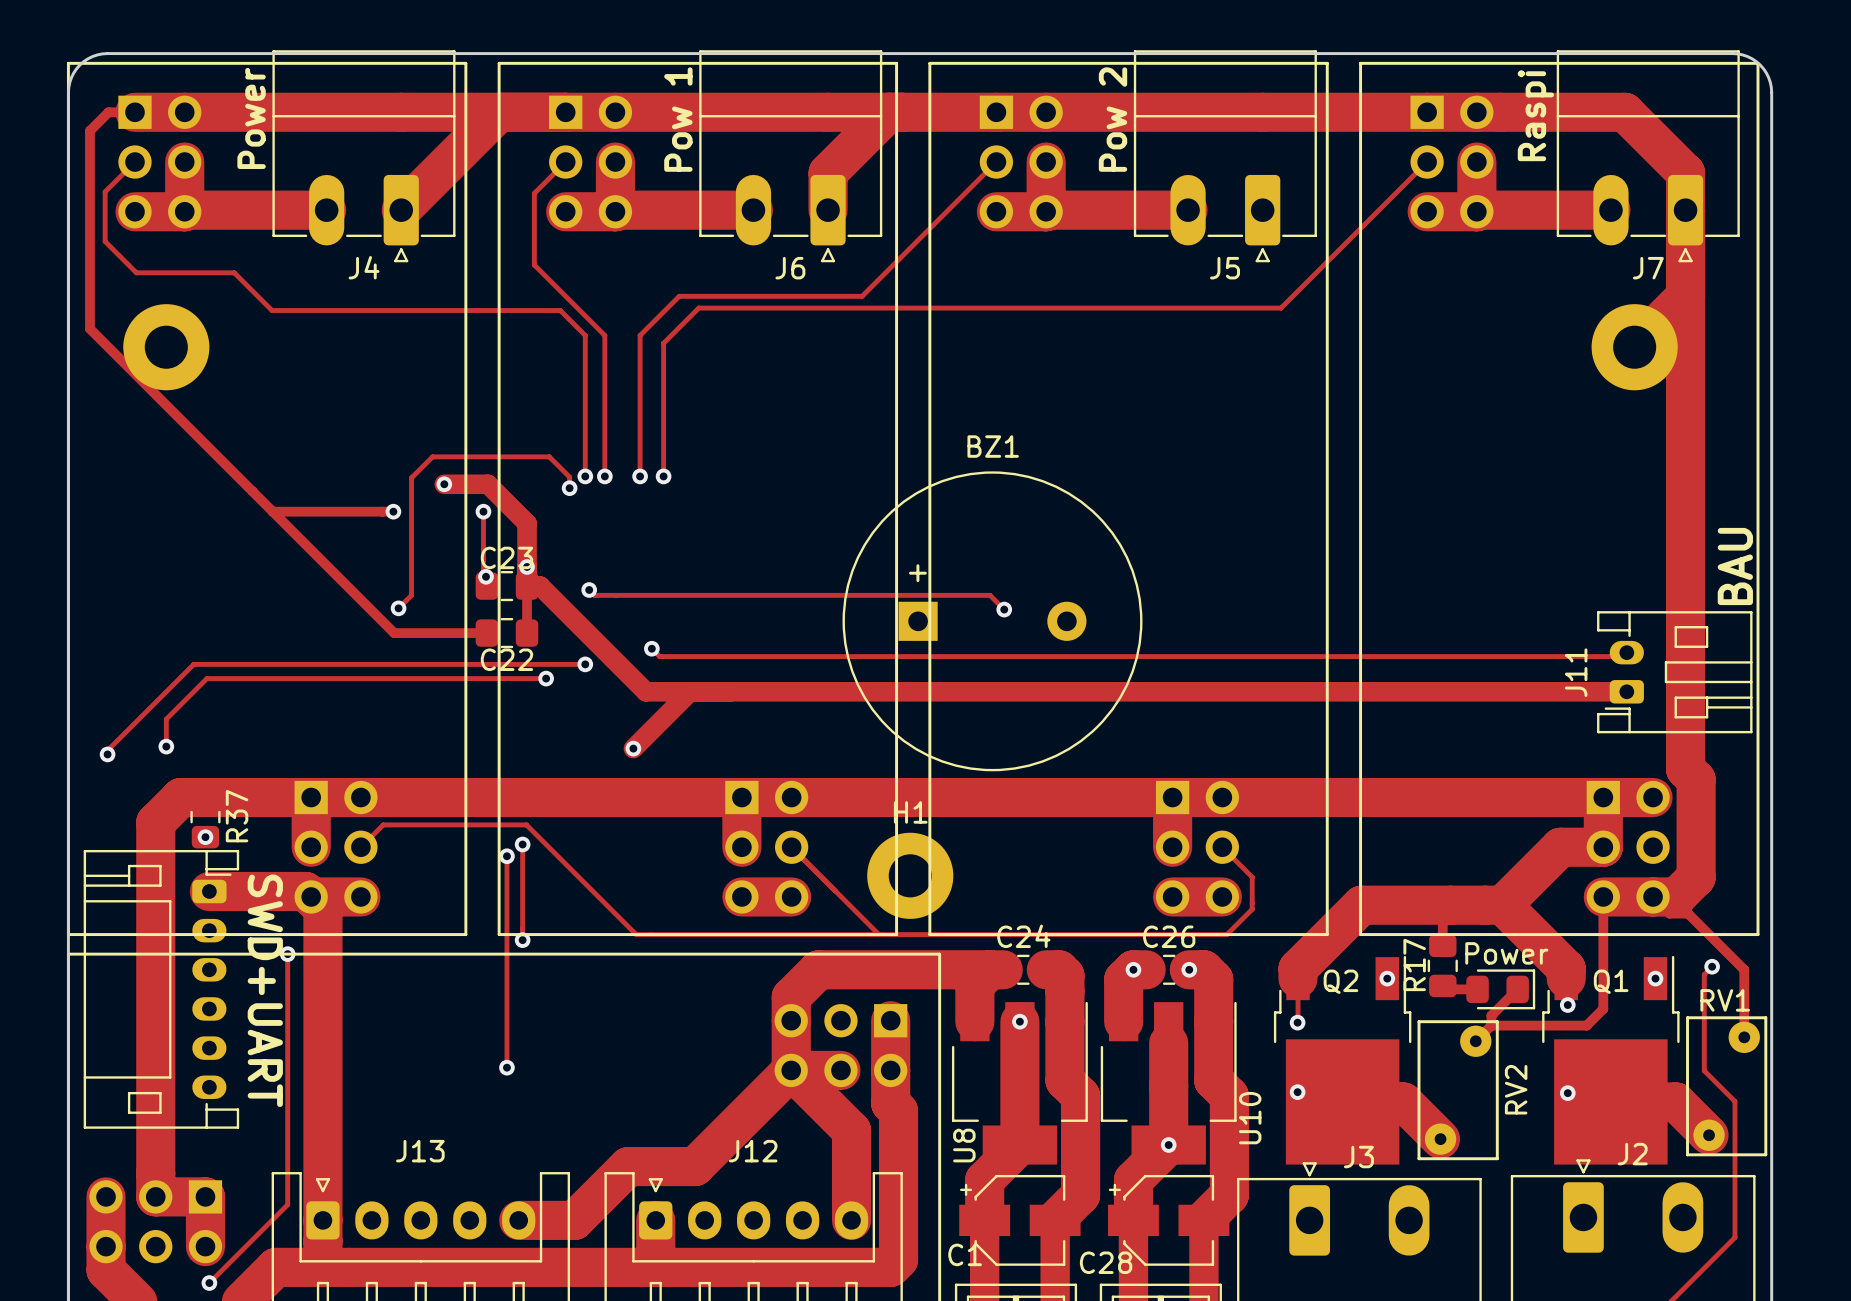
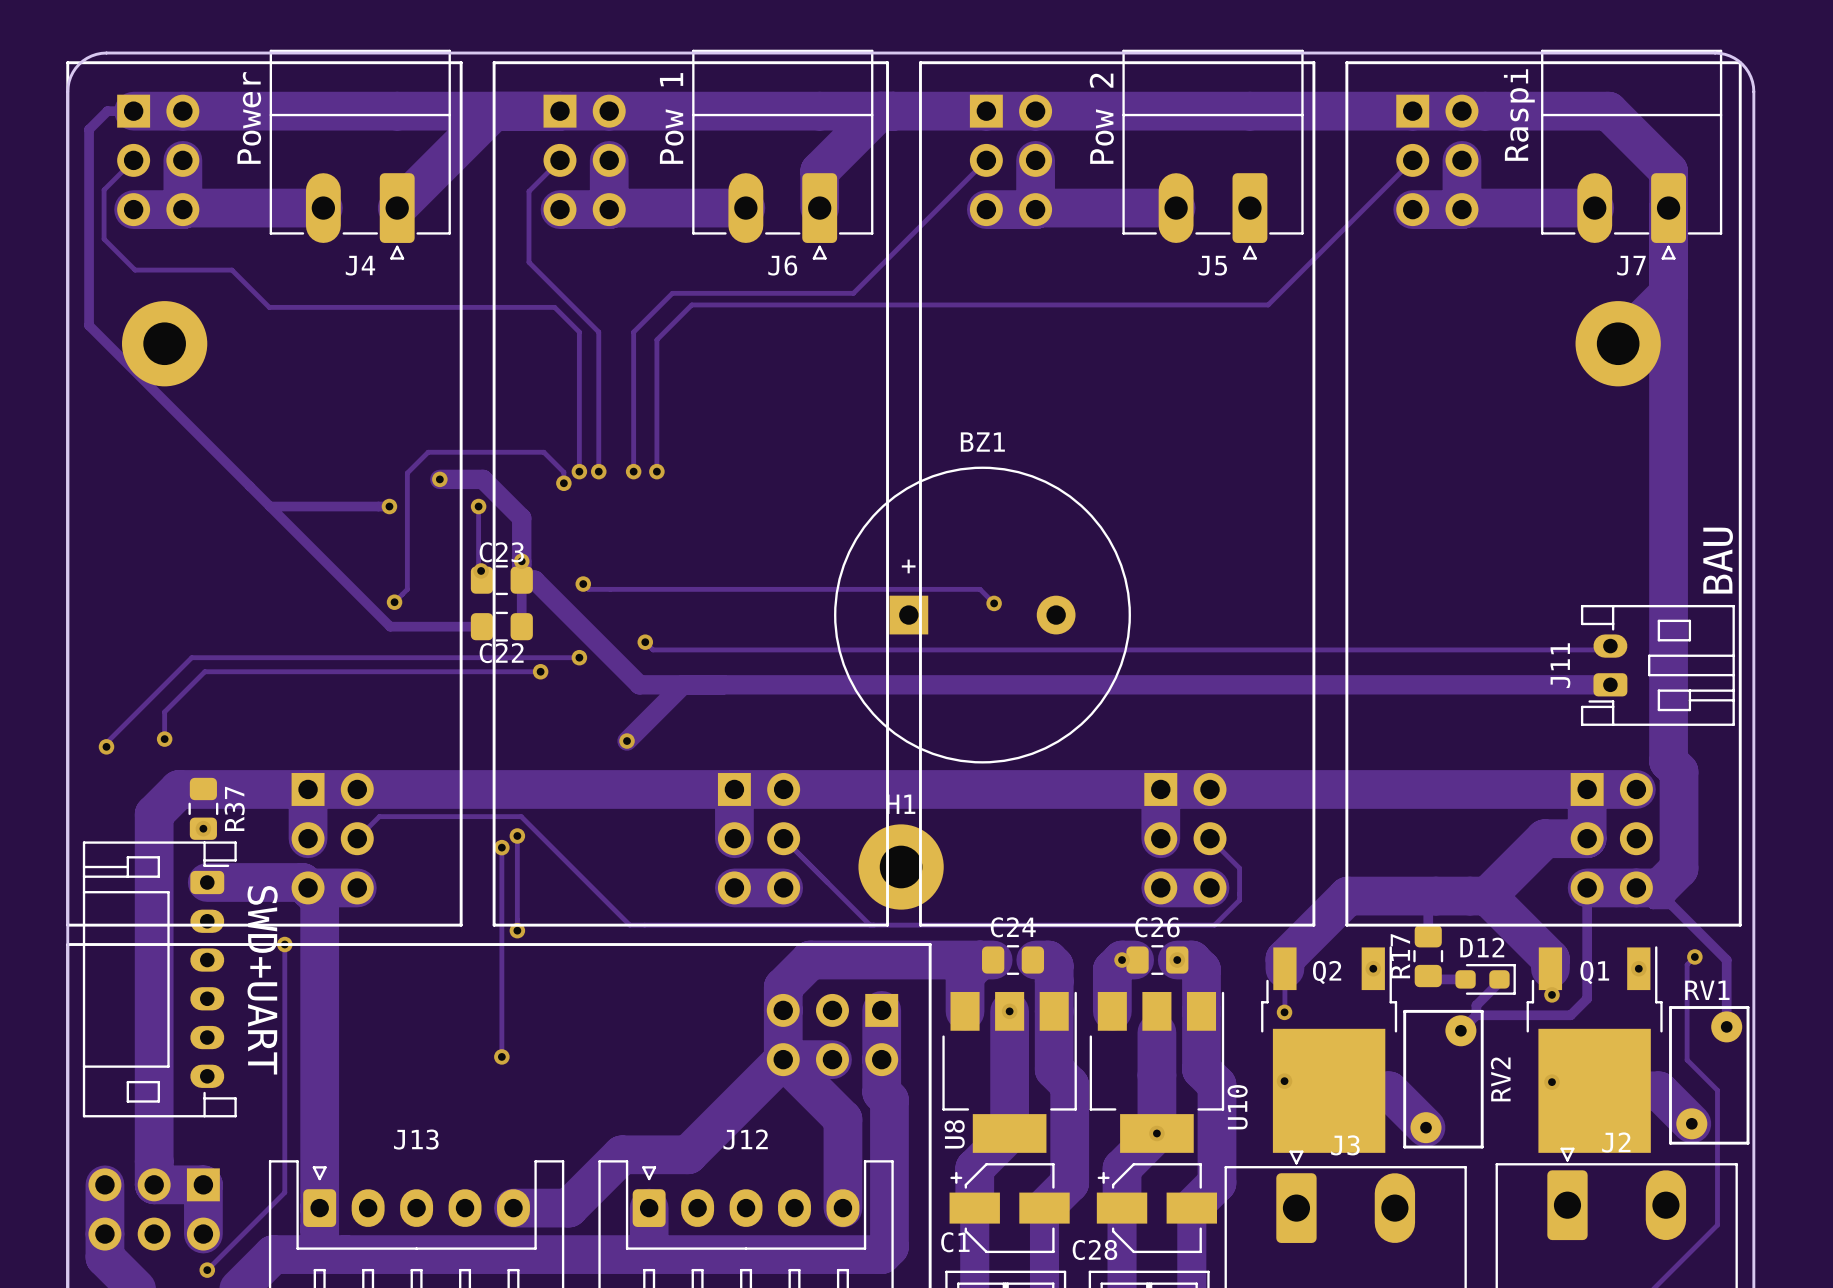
text: Power (1506, 953) -> none
part: (1500, 989) -> none
D12: none -> (1485, 979)

